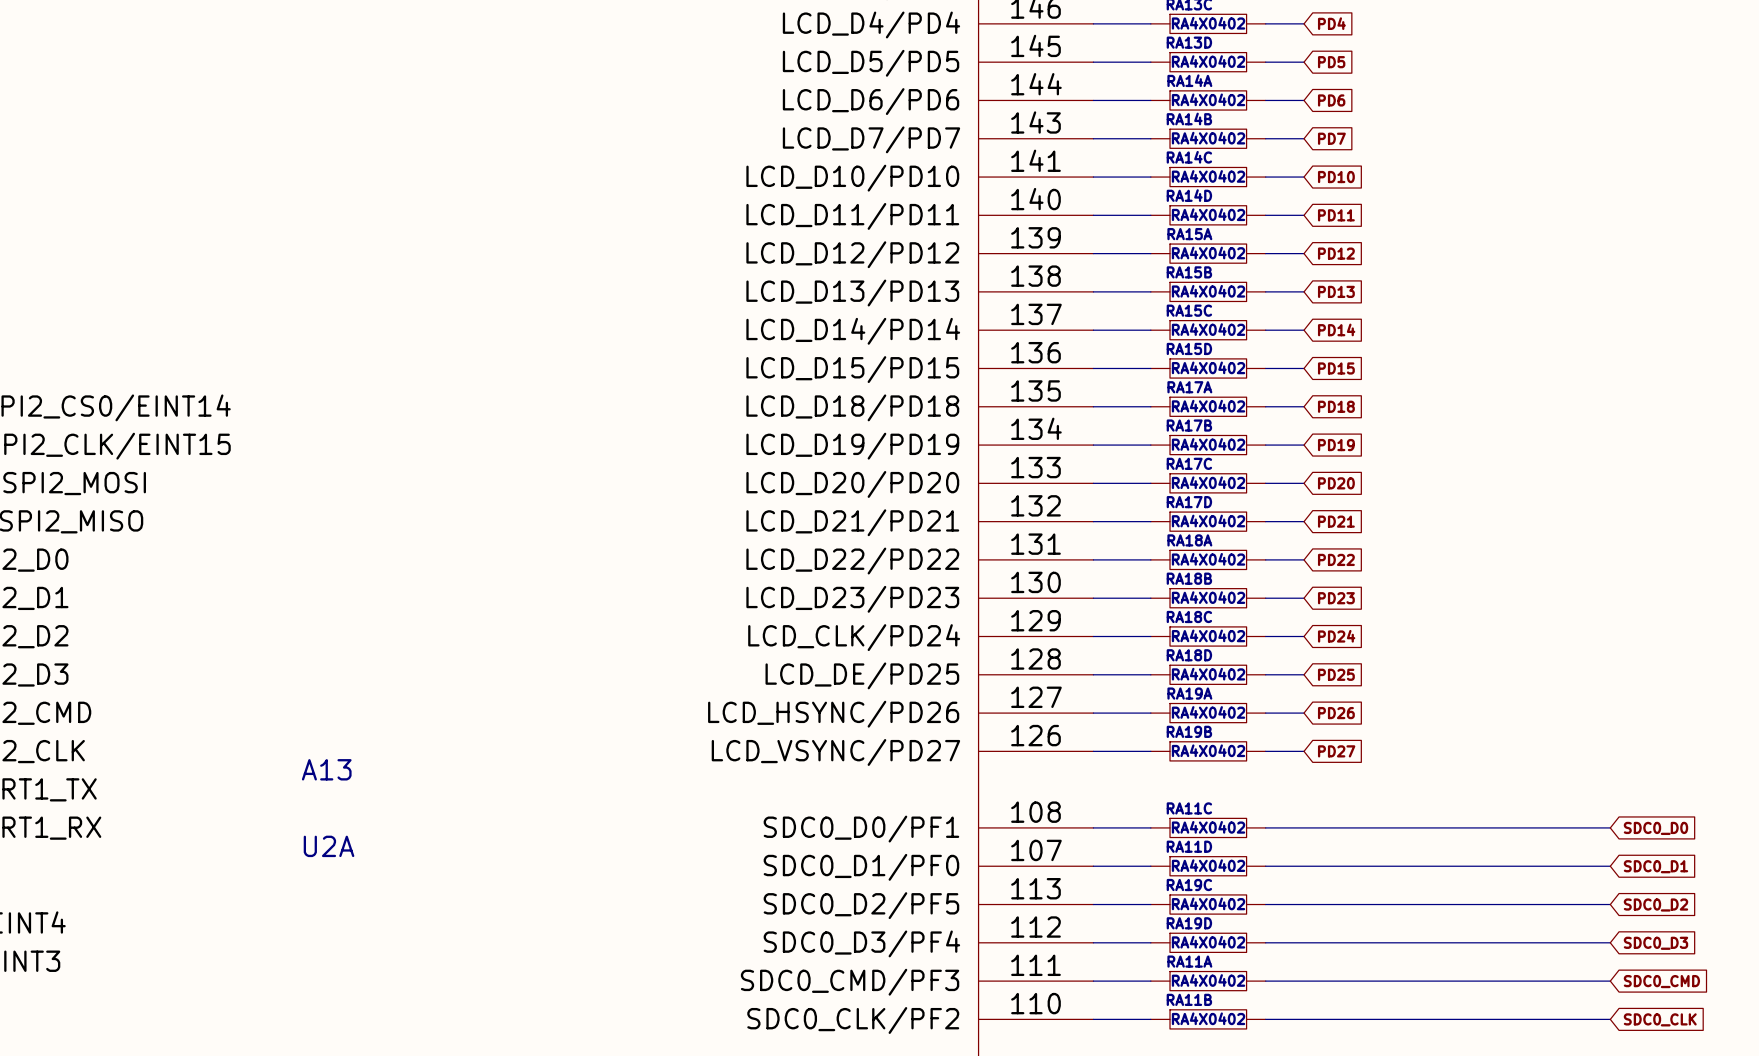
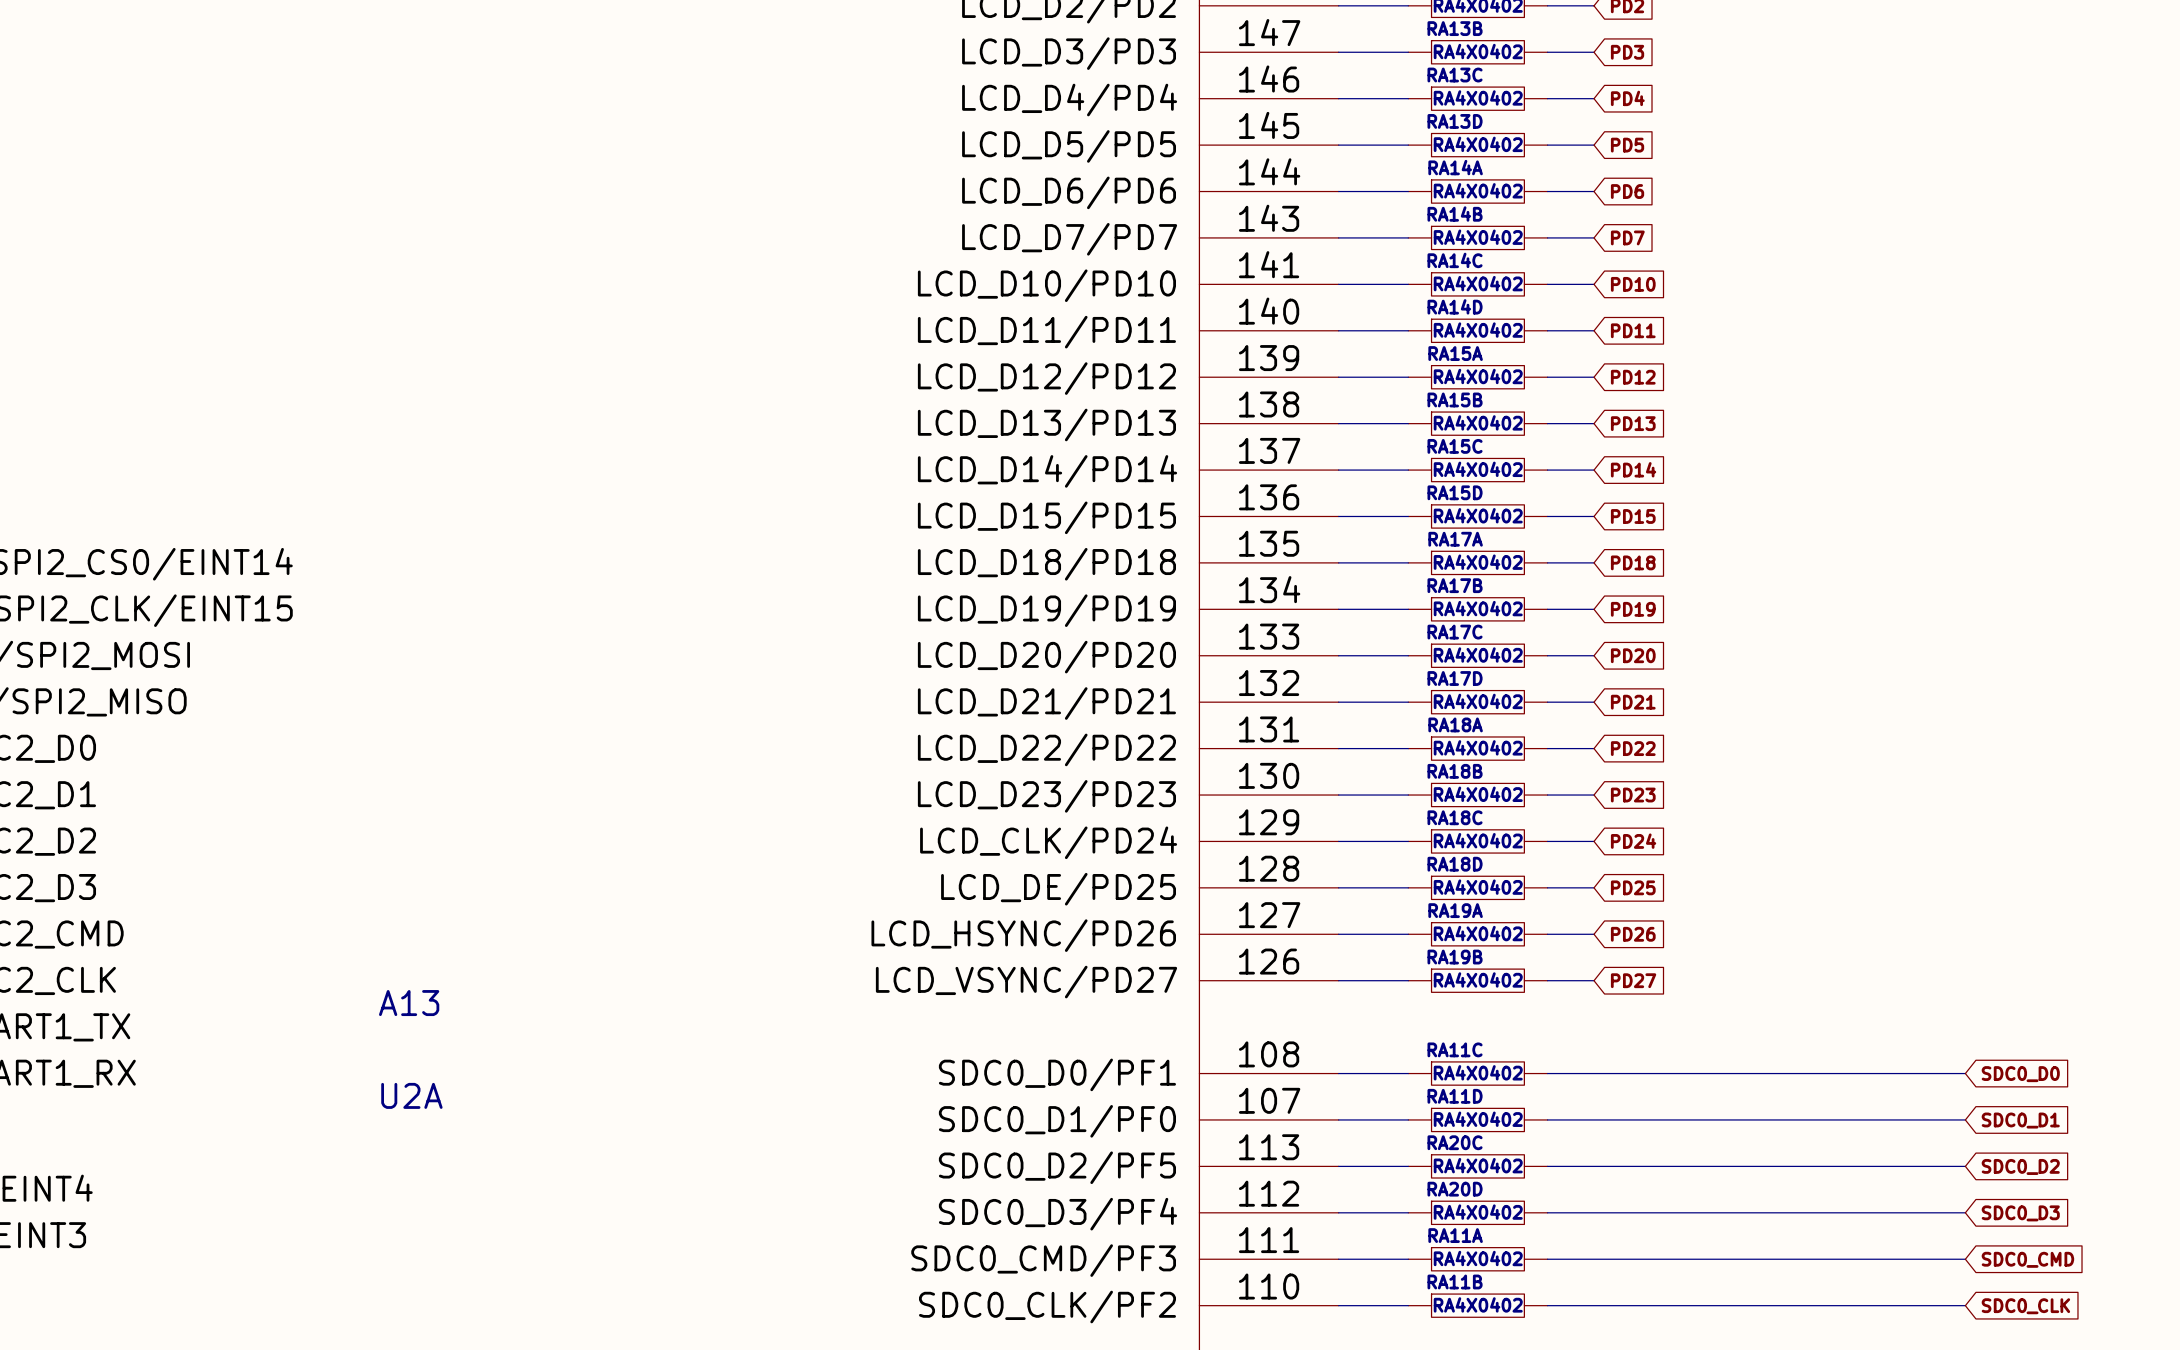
RA19C name: RA19C (1189, 885) -> RA20C (1455, 1142)
RA19D name: RA19D (1189, 923) -> RA20D (1455, 1189)

